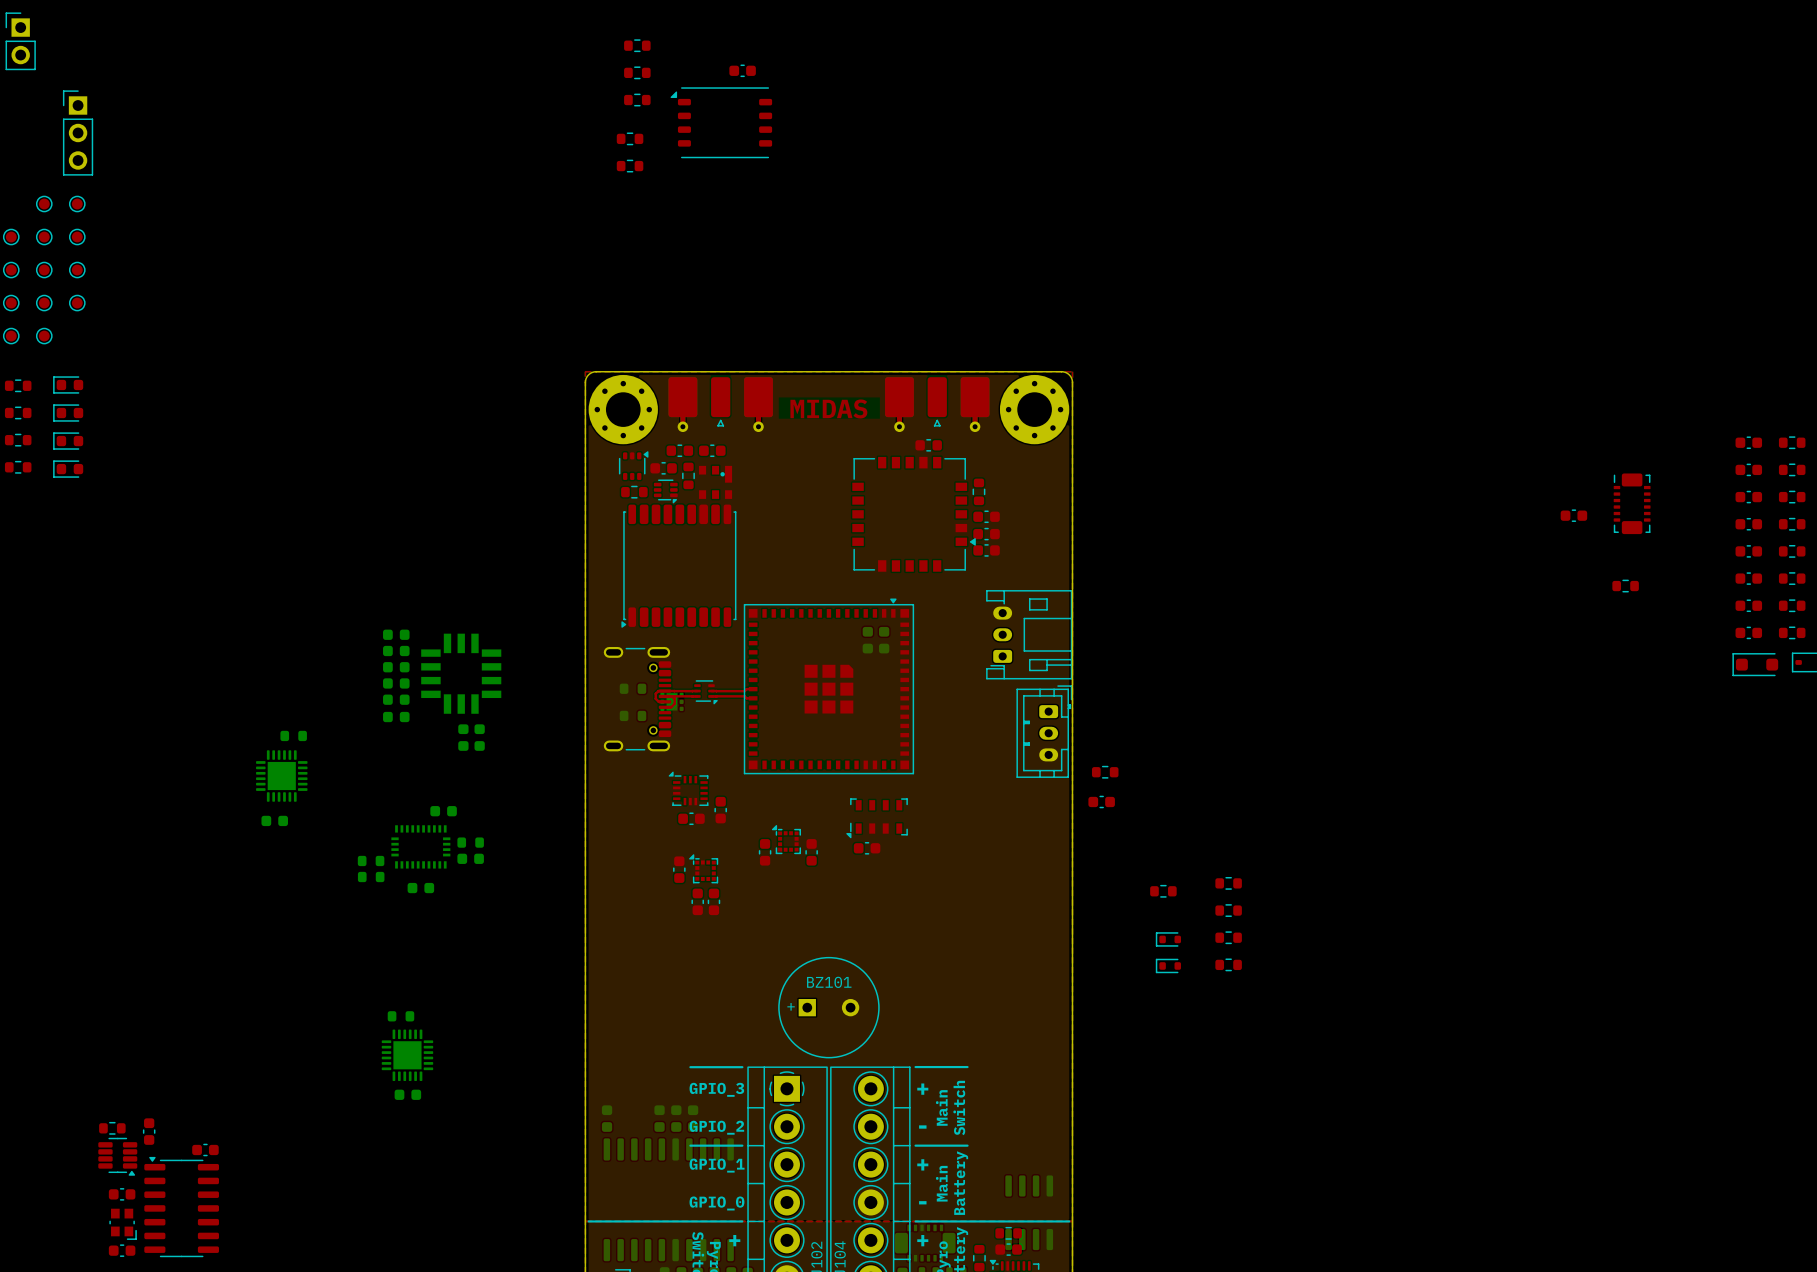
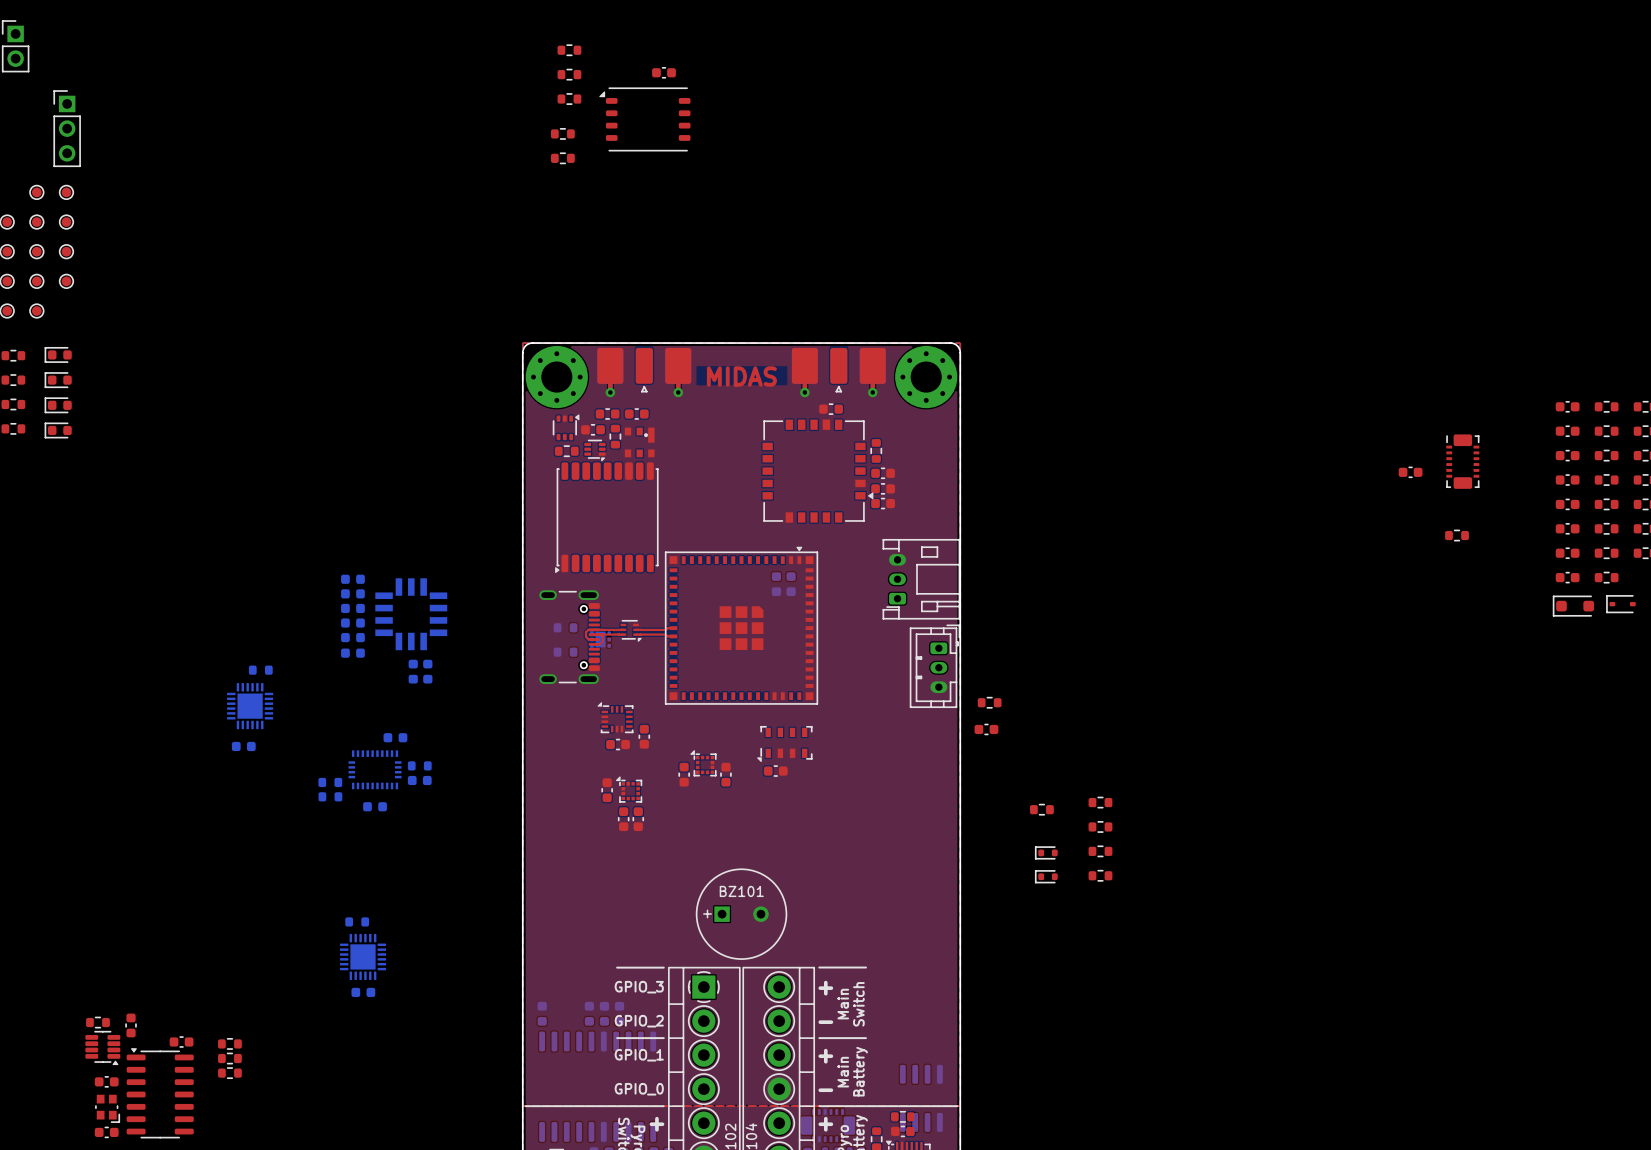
part: none -> (229, 1043)
part: none -> (229, 1058)
part: none -> (229, 1073)

